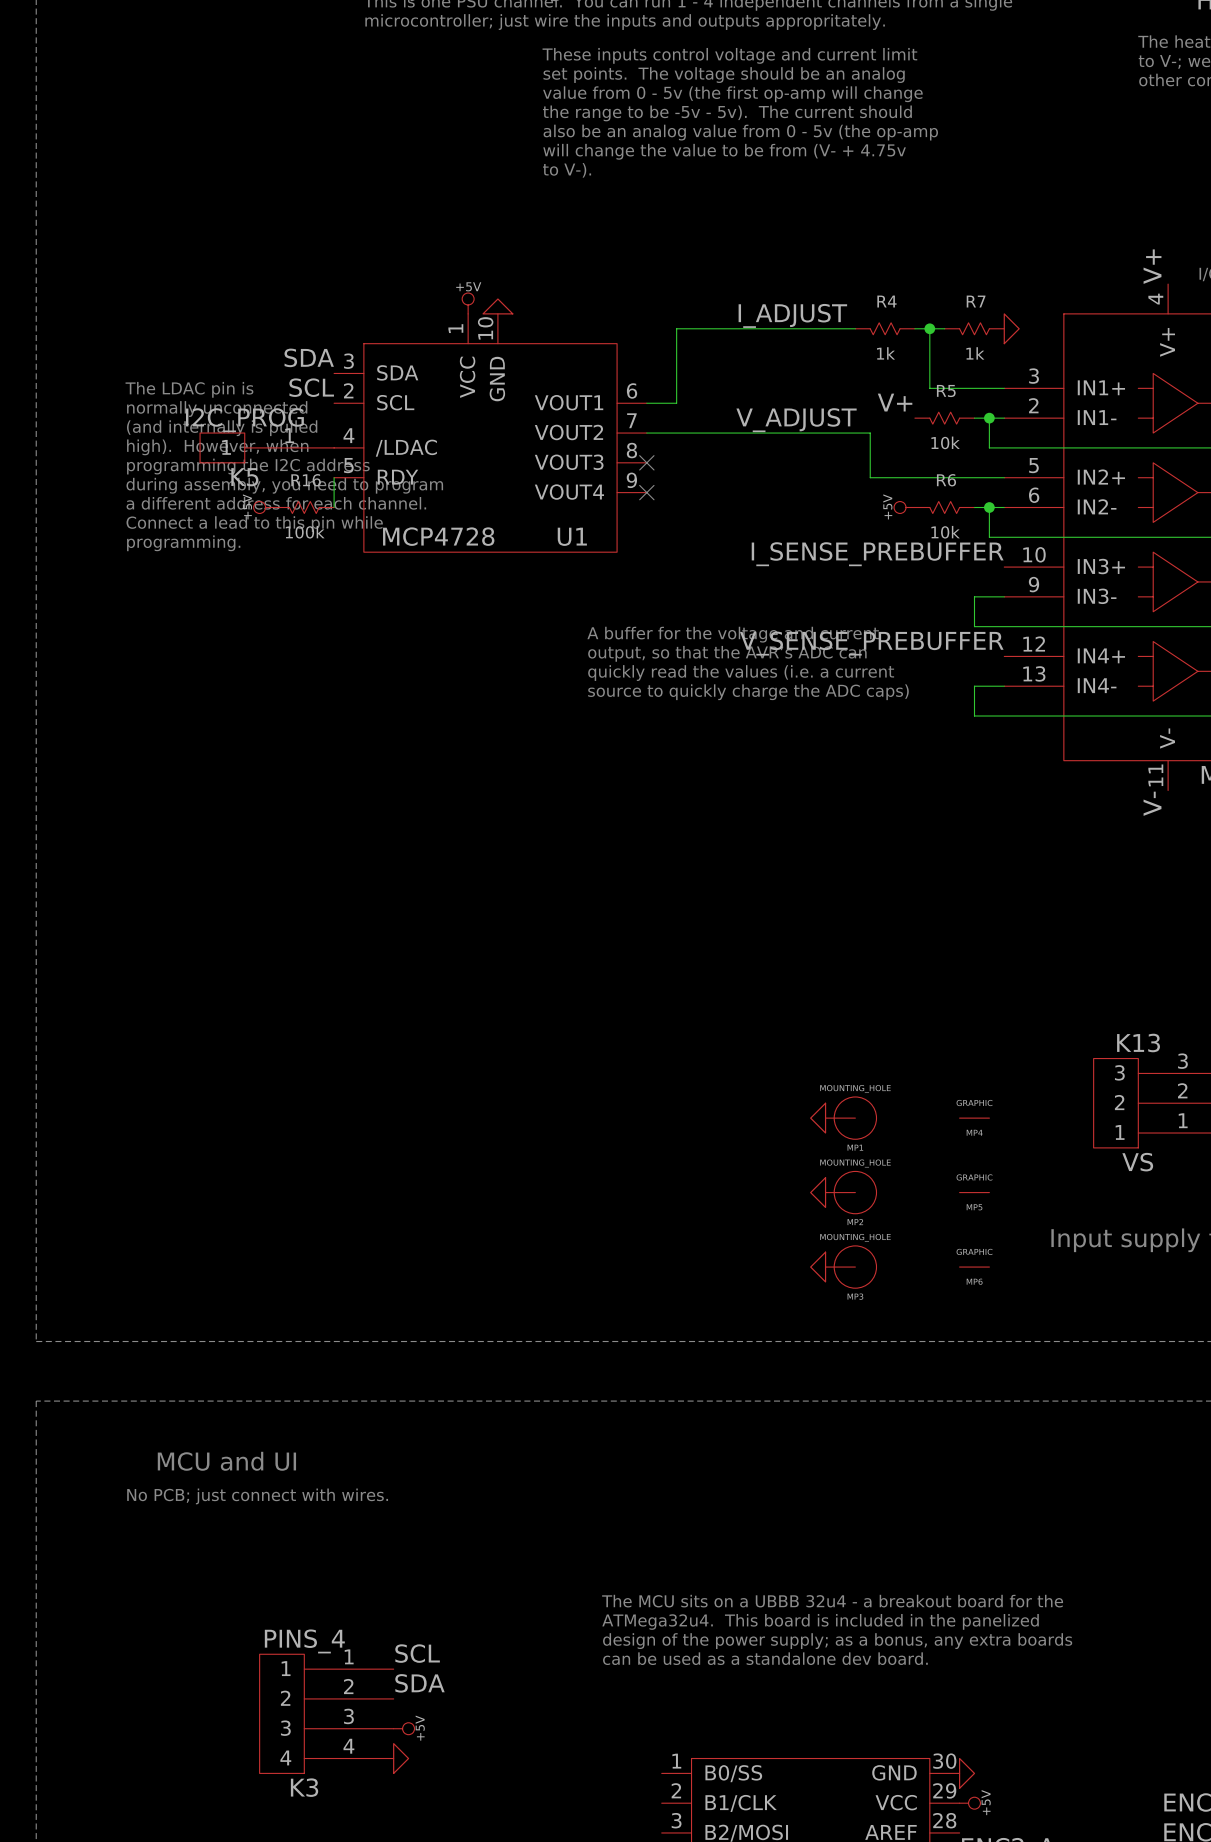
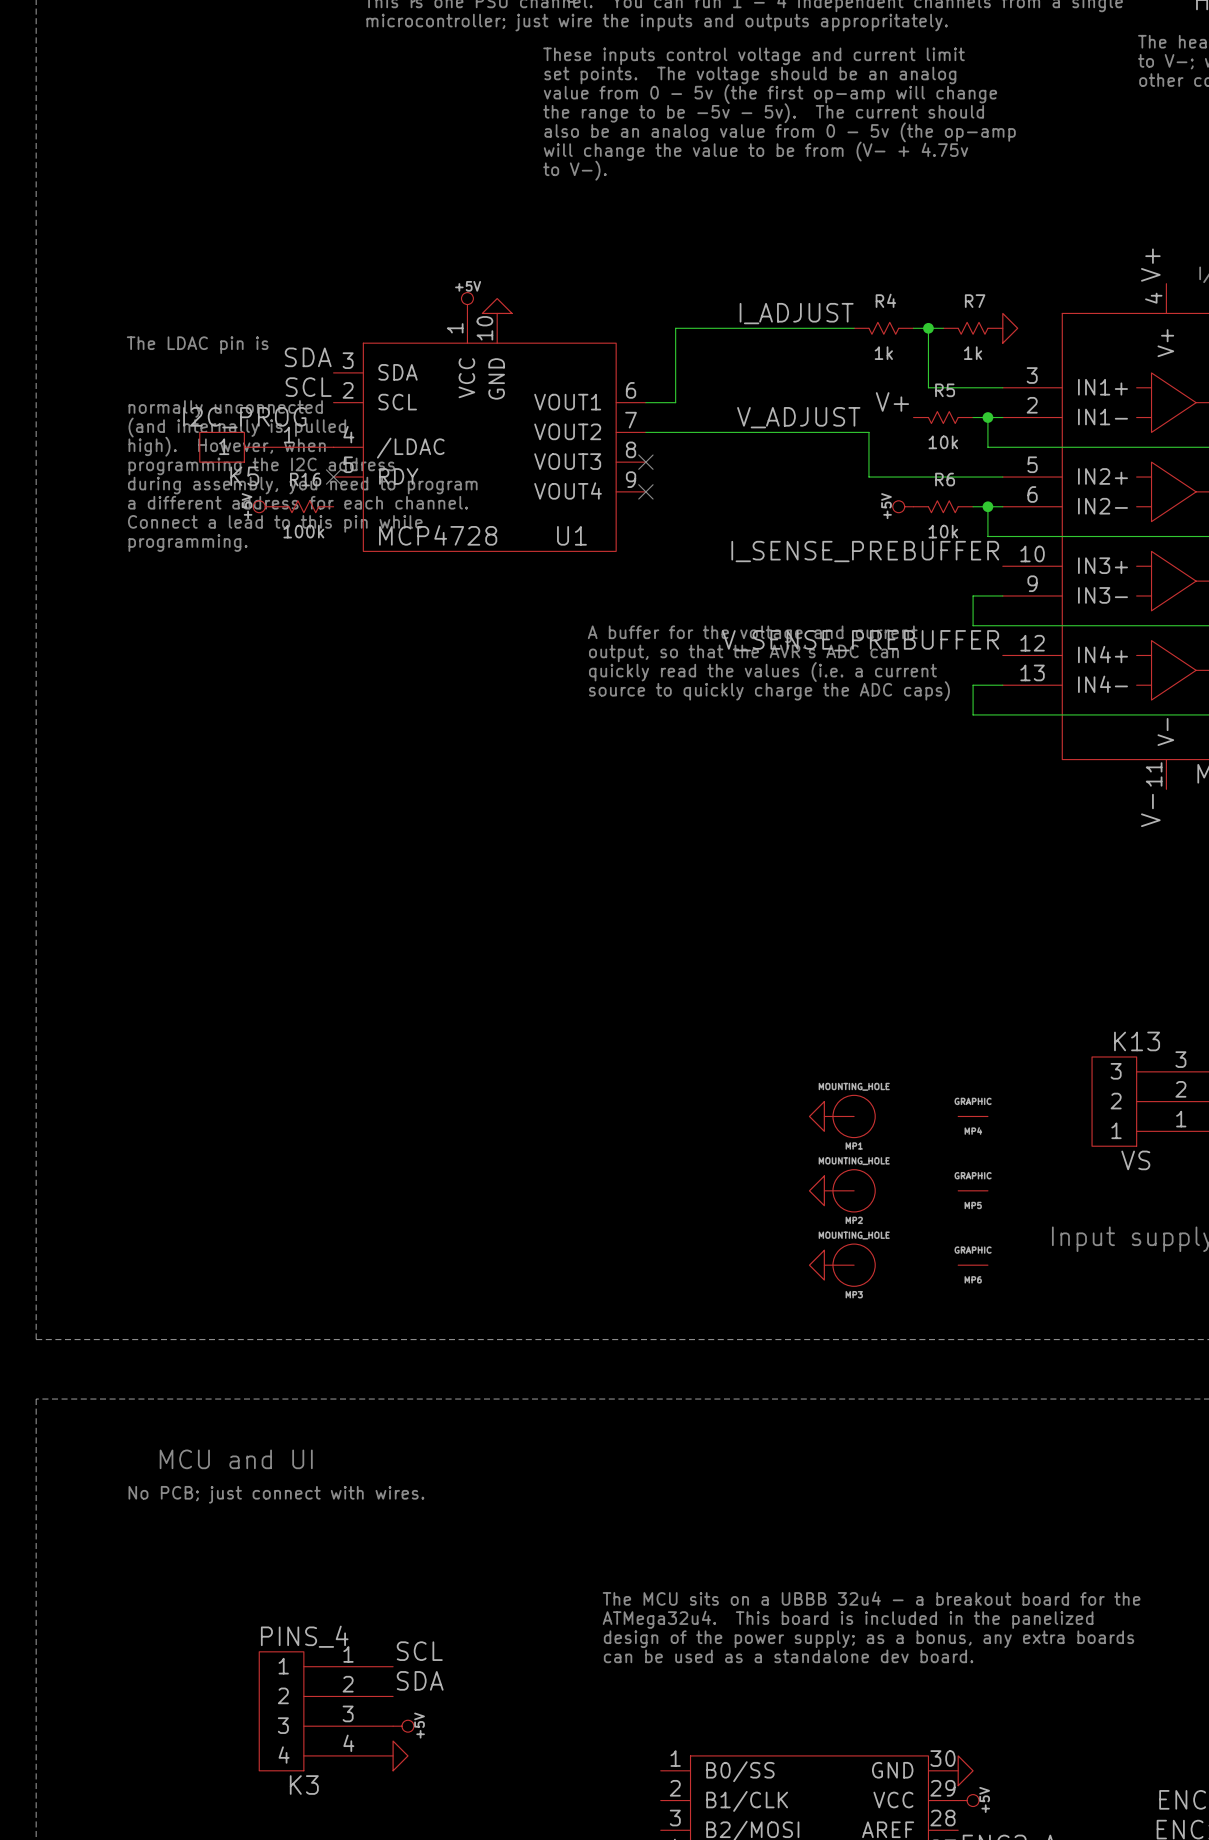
text position: The LDAC pin is (189, 389) -> The LDAC pin is (197, 345)
wire: (334, 477) (334, 507) -> none
no-connect mark: none -> (333, 477)

